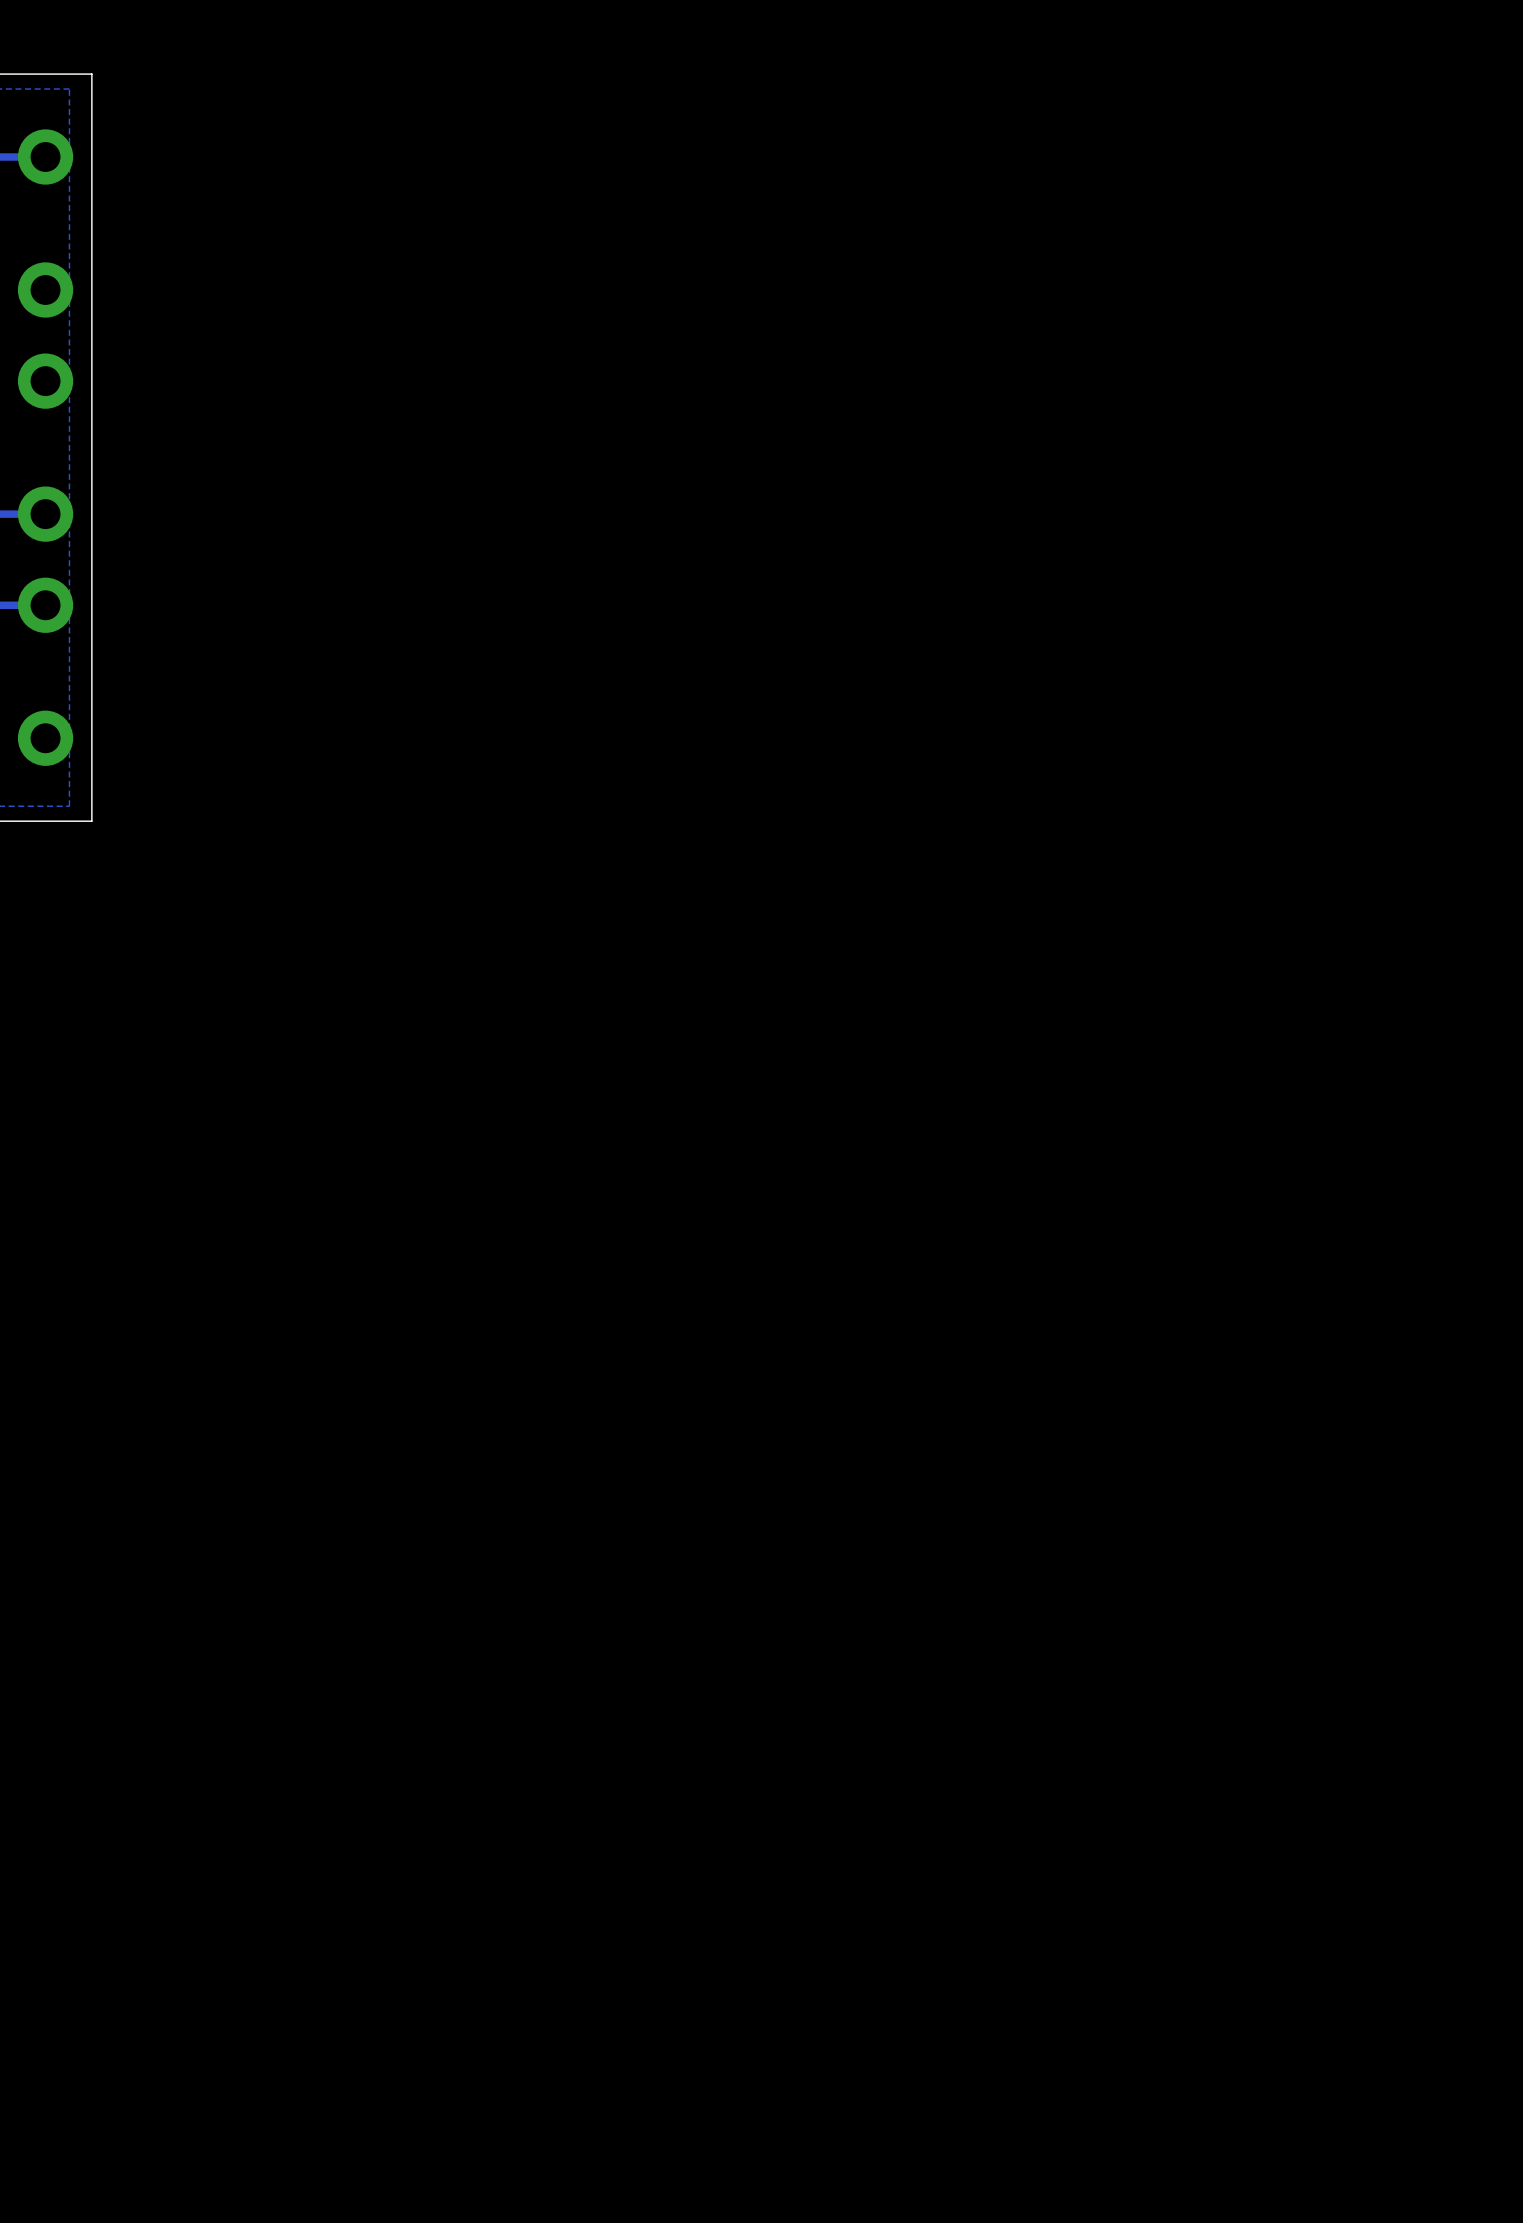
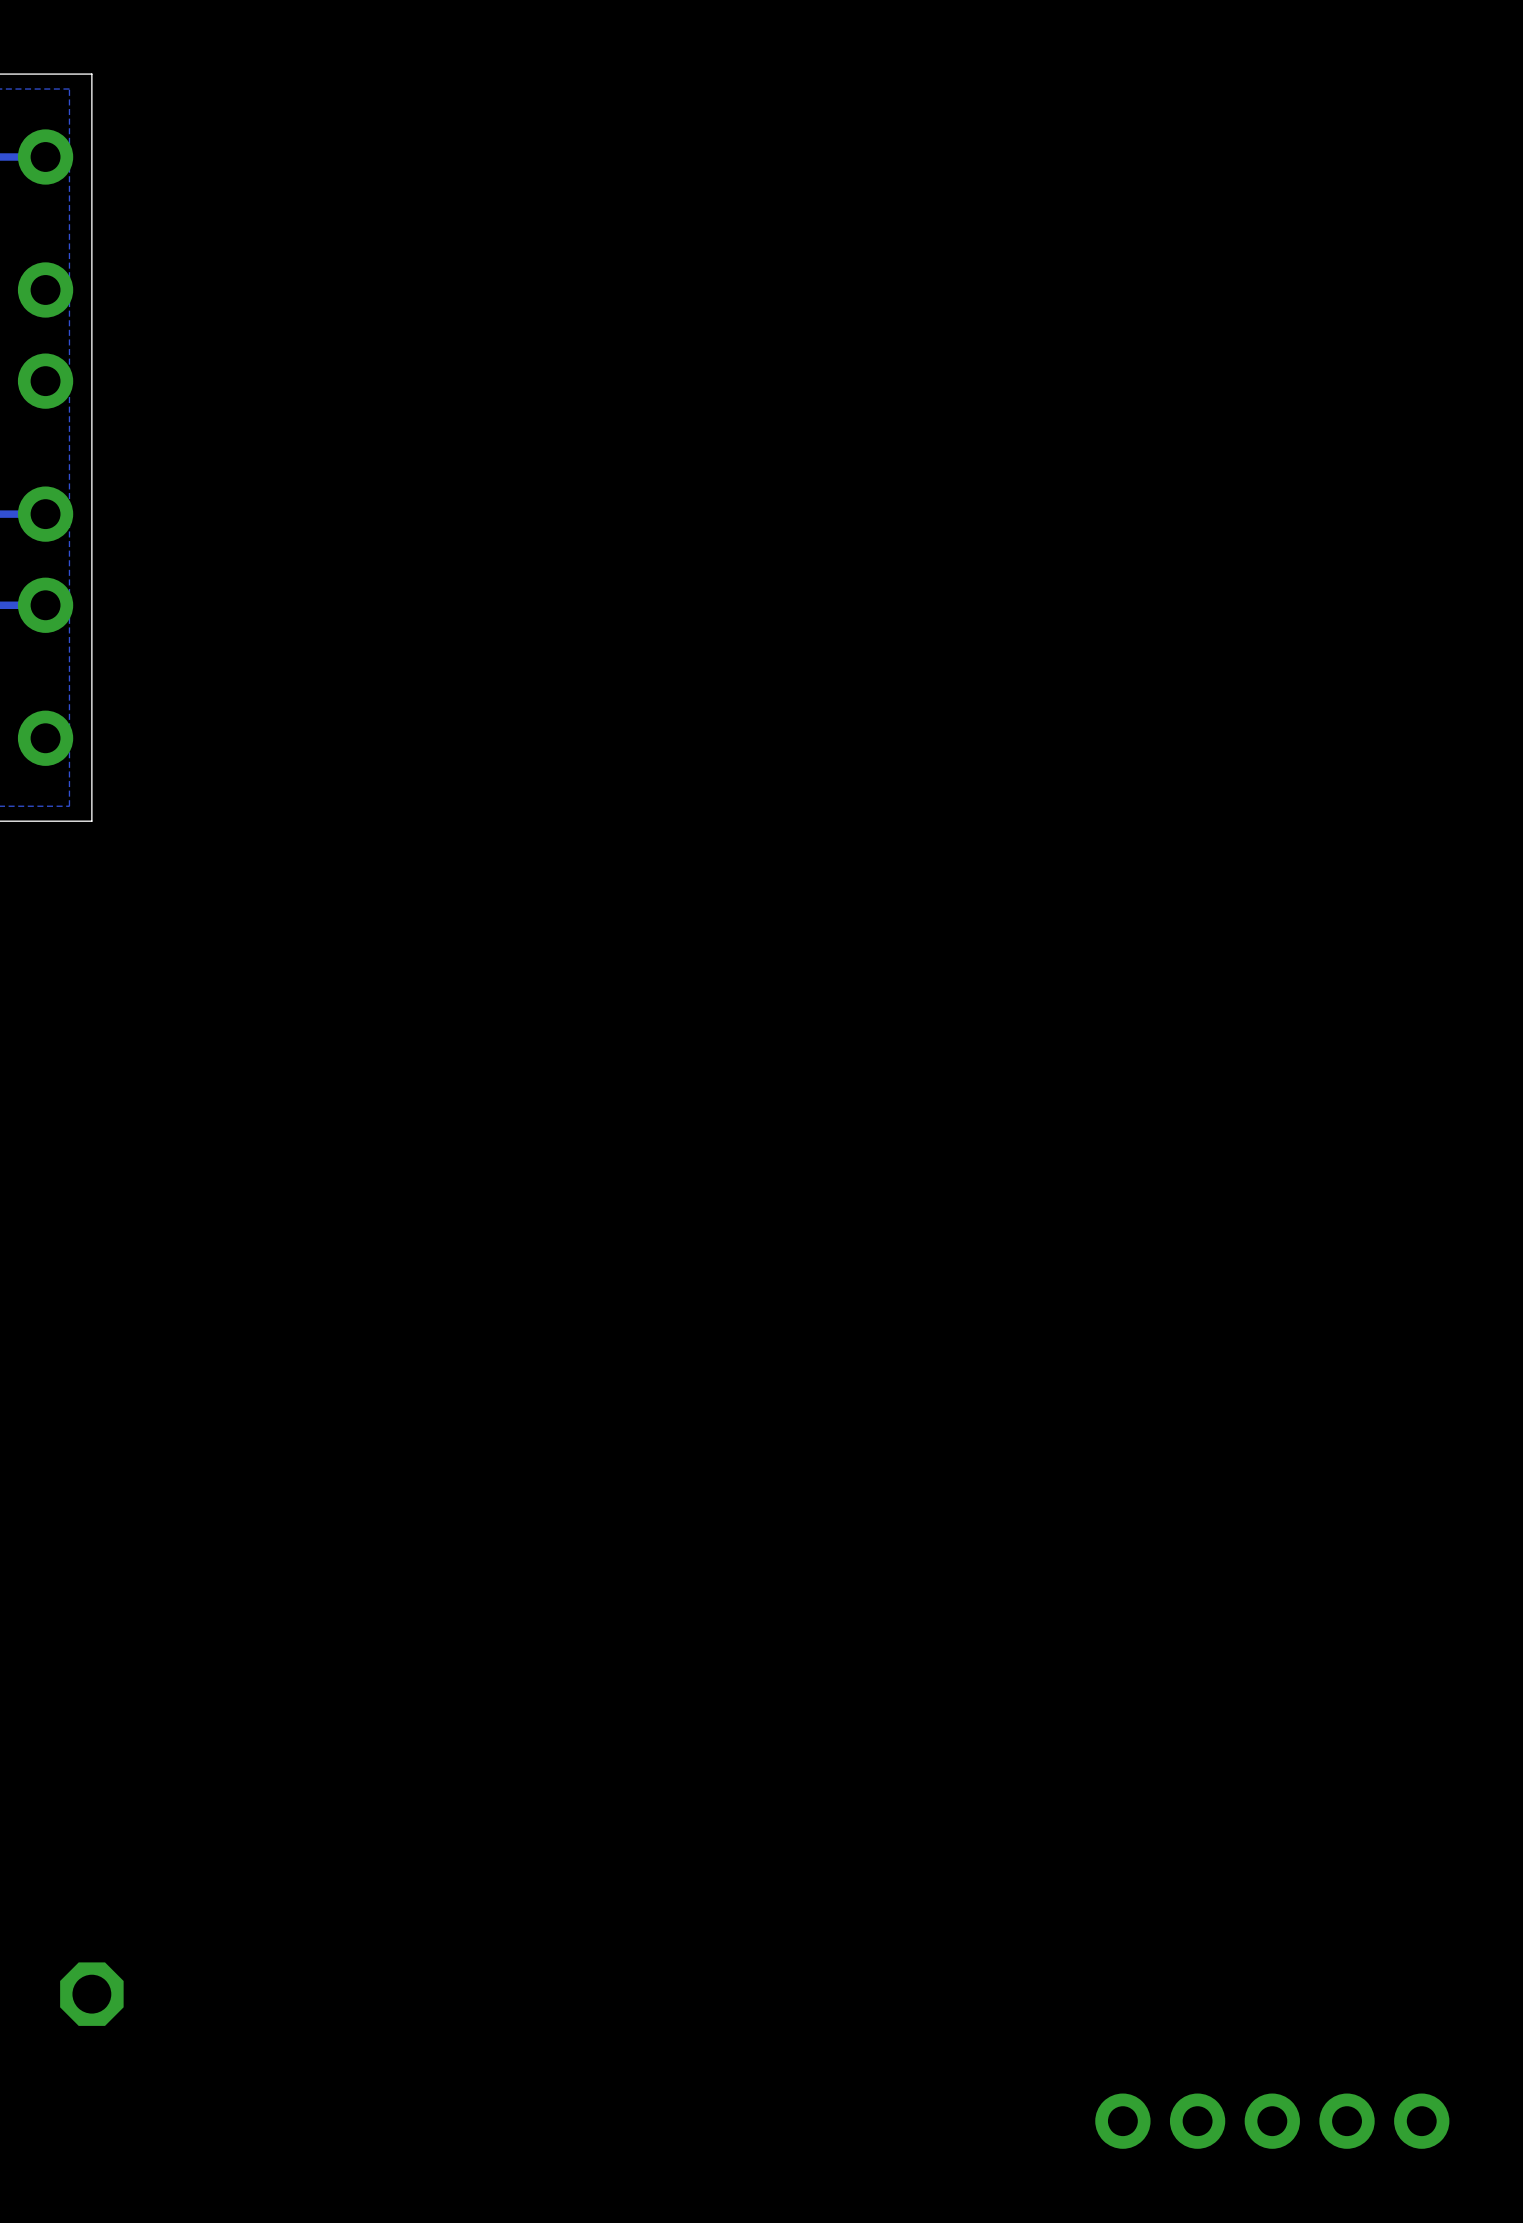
part: none -> (91, 1994)
part: none -> (1272, 2121)

